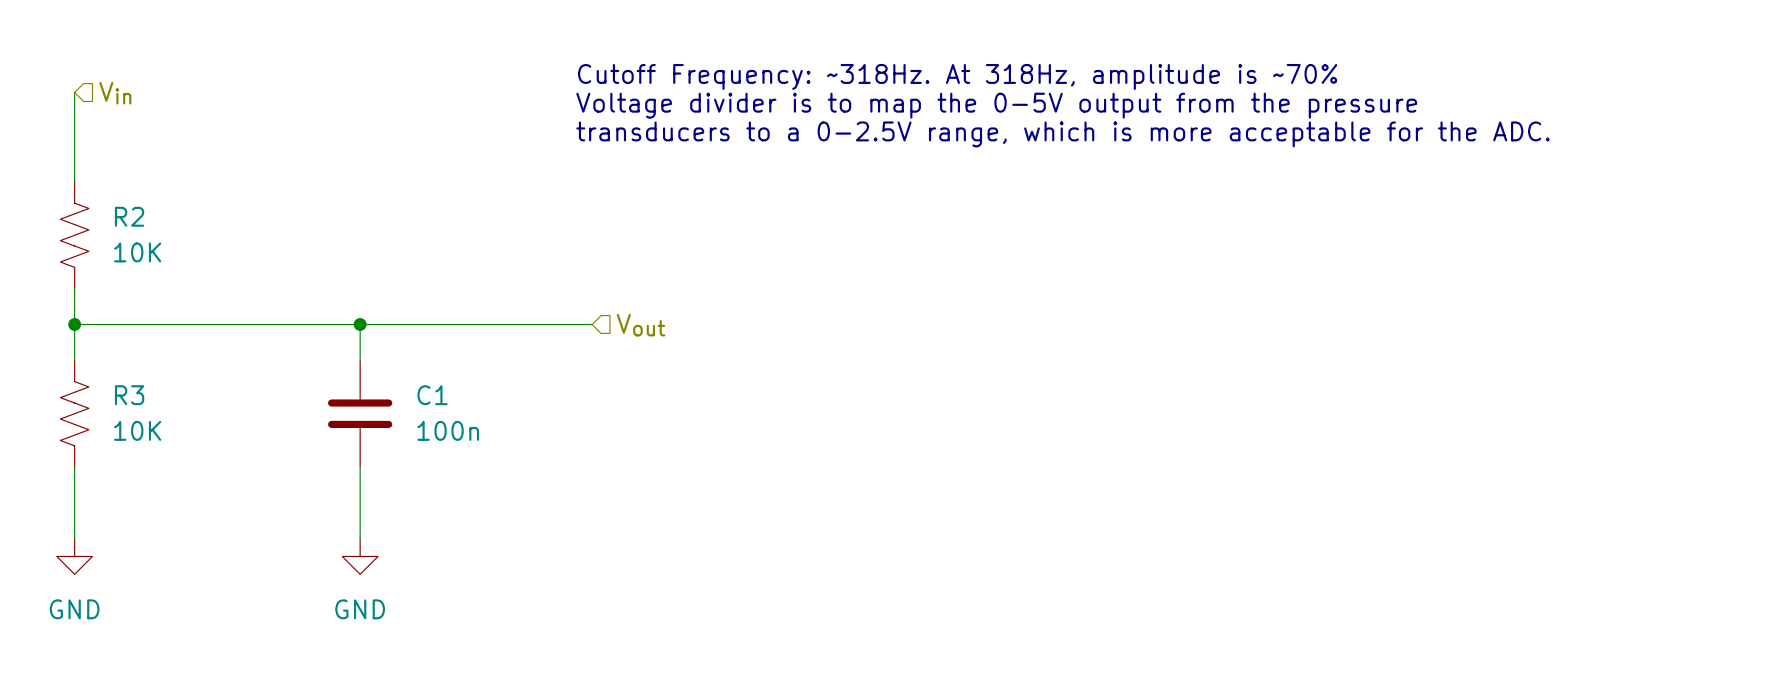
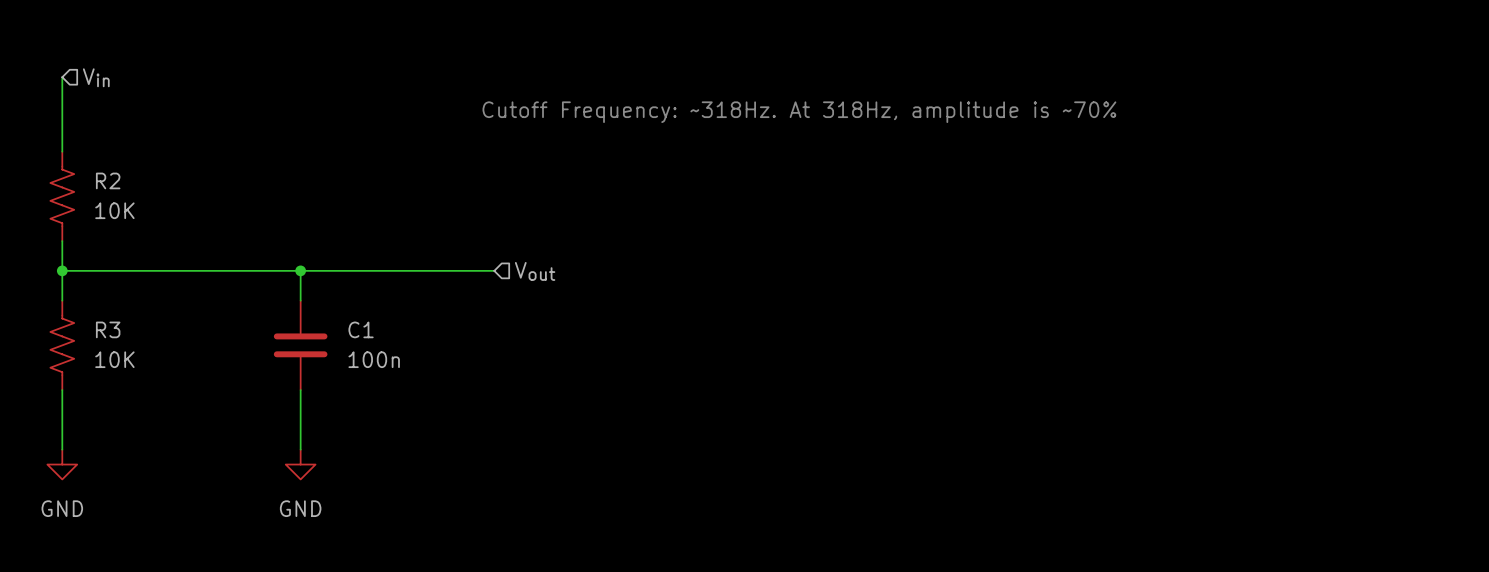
text: Cutoff Frequency: ~318Hz. At 318Hz, amplitude is ~70% (957, 76) -> none
text: Voltage divider is to map the 0-5V output from the pressure (996, 105) -> none
text: transducers to a 0-2.5V range, which is more acceptable for the ADC. (1063, 134) -> Cutoff Frequency: ~318Hz. At 318Hz, amplitude is ~70% (799, 112)

